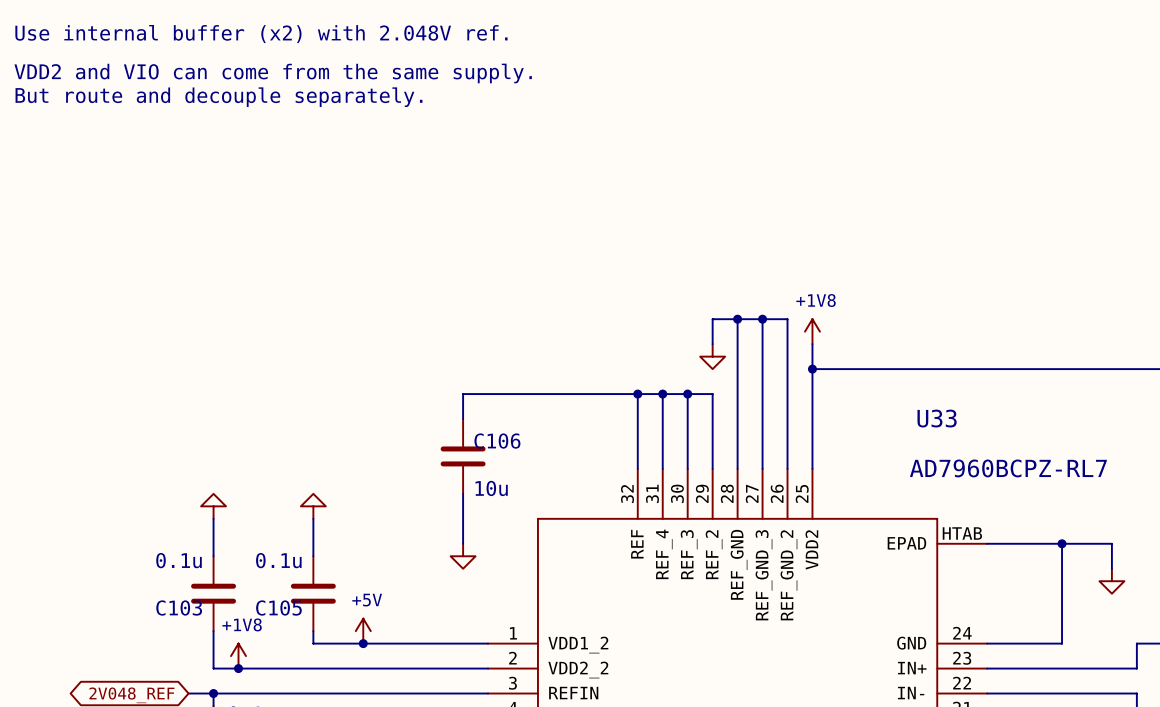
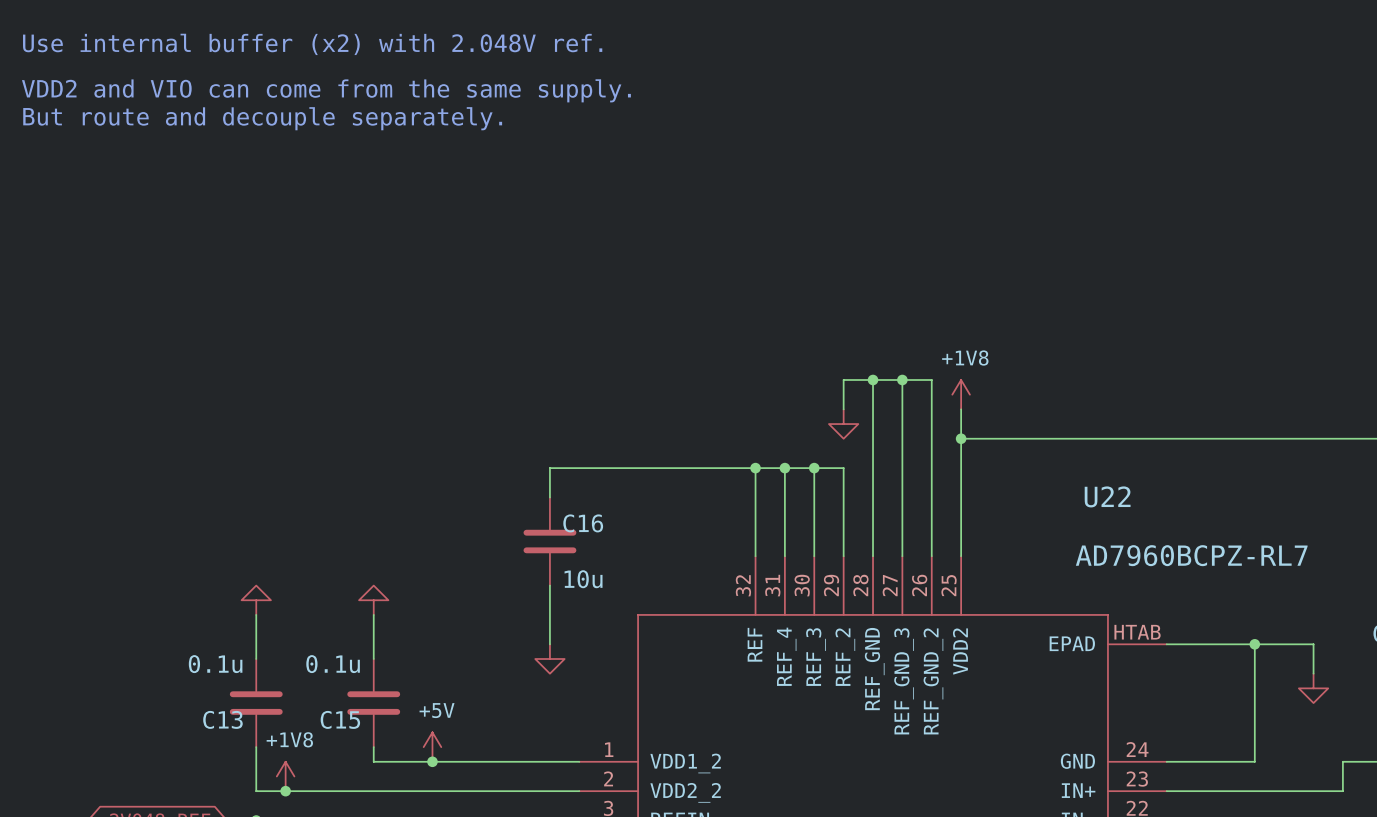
U33 name: U33 (937, 418) -> U22 (1107, 496)
C106 name: C106 (497, 441) -> C16 (583, 523)
C103 name: C103 (179, 608) -> C13 (222, 719)
C105 name: C105 (278, 608) -> C15 (340, 719)

